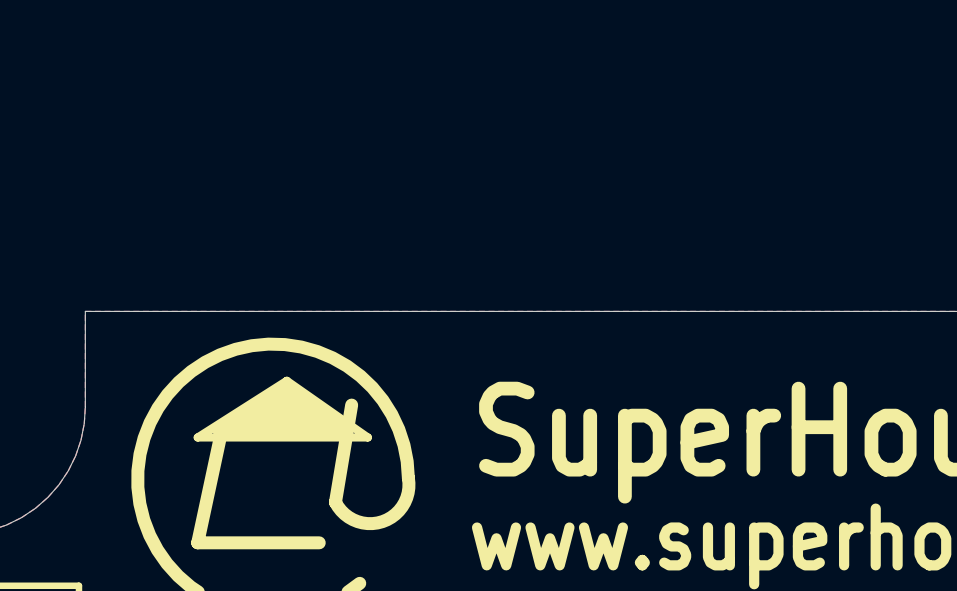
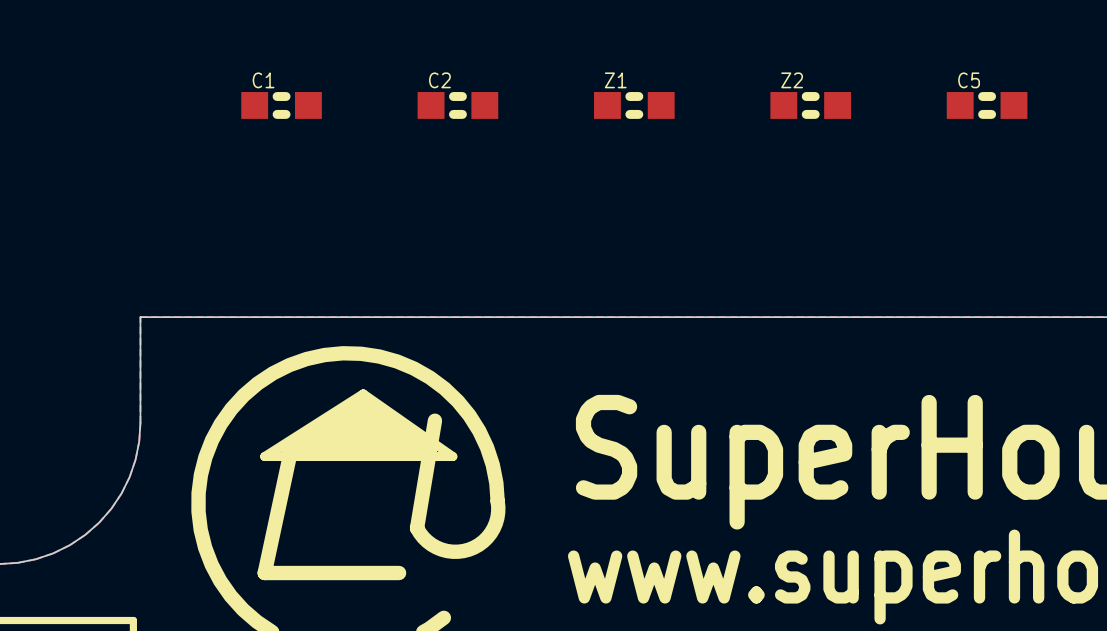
C1: none -> (281, 105)
C2: none -> (457, 105)
Z1: none -> (634, 105)
Z2: none -> (810, 105)
C5: none -> (987, 105)

